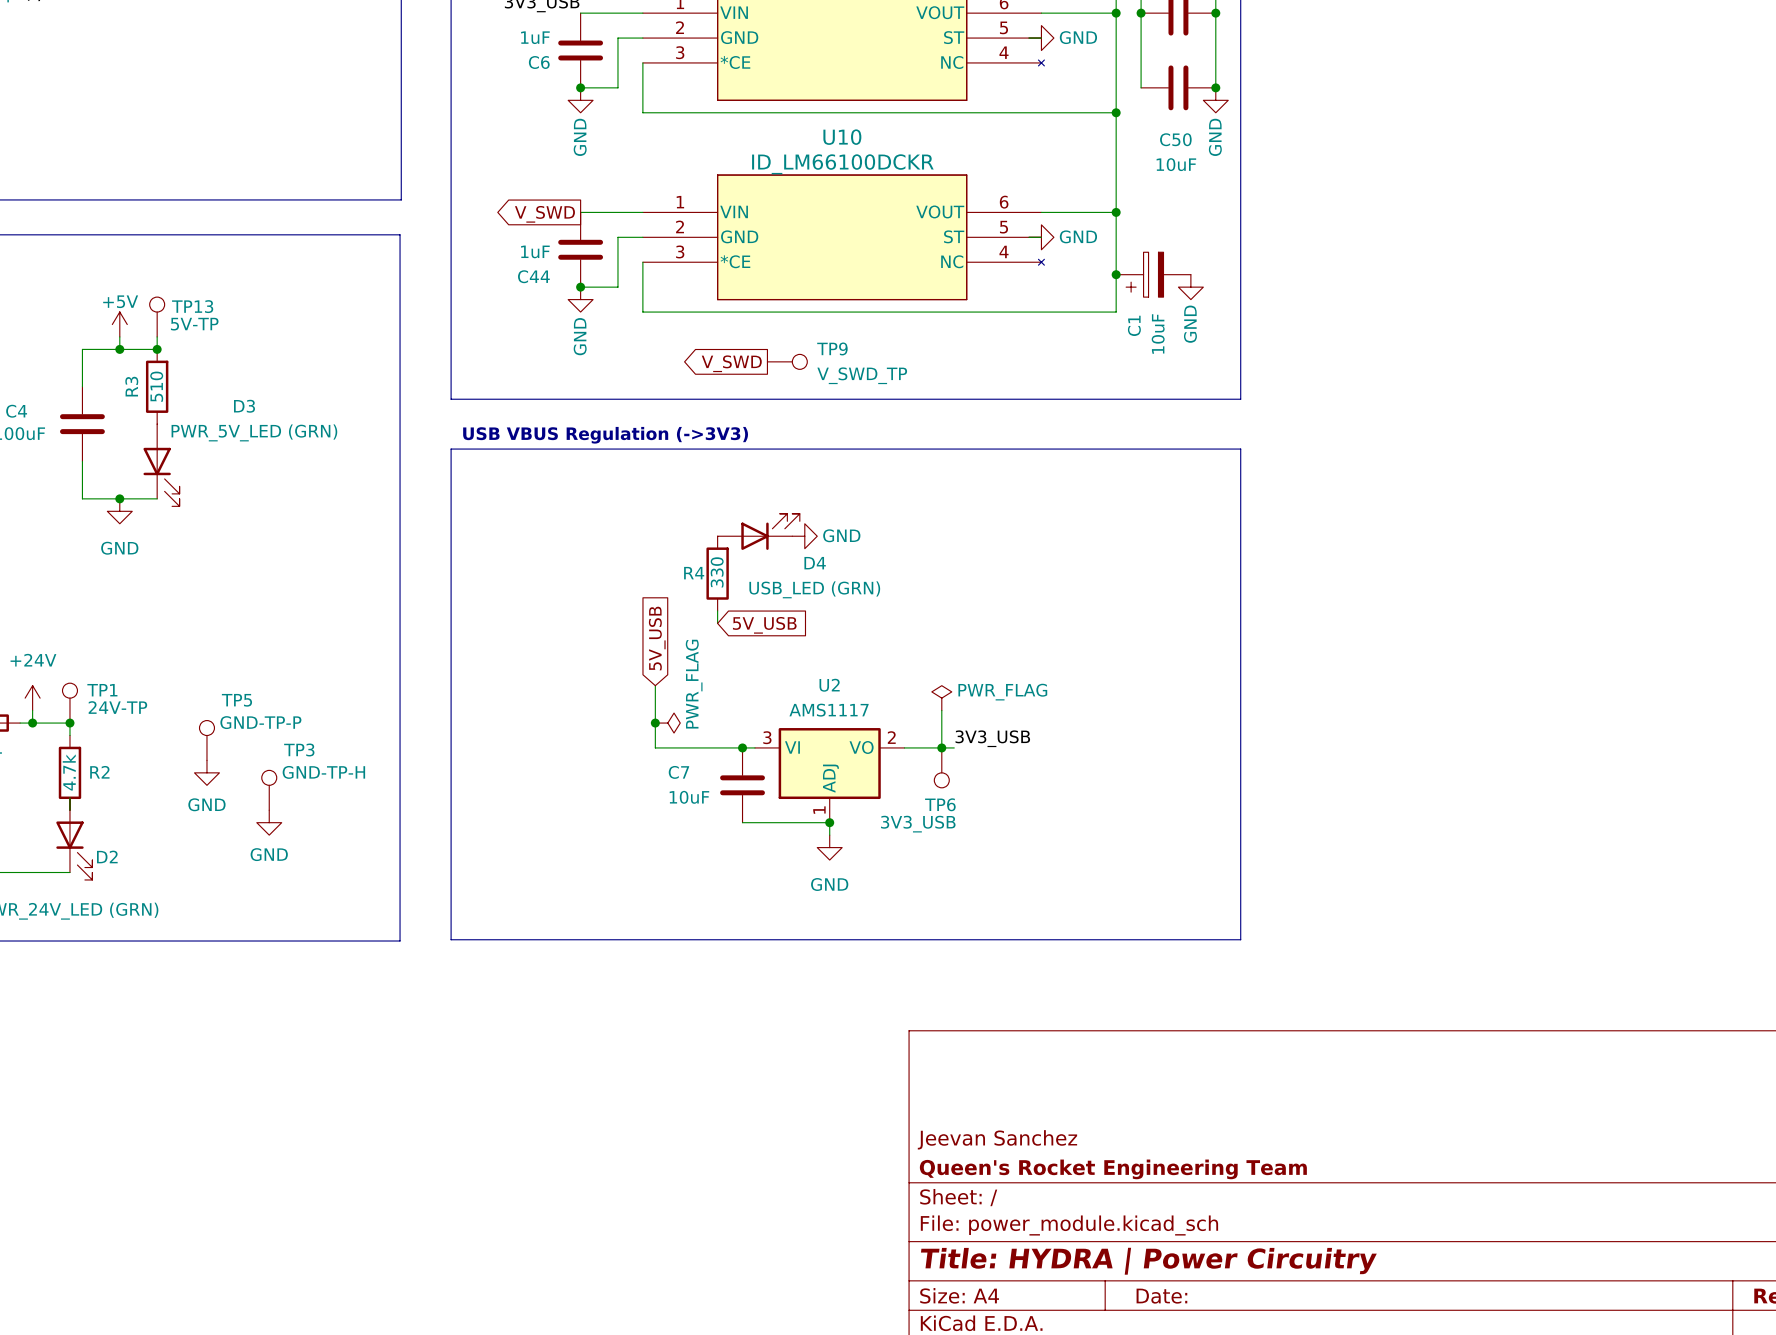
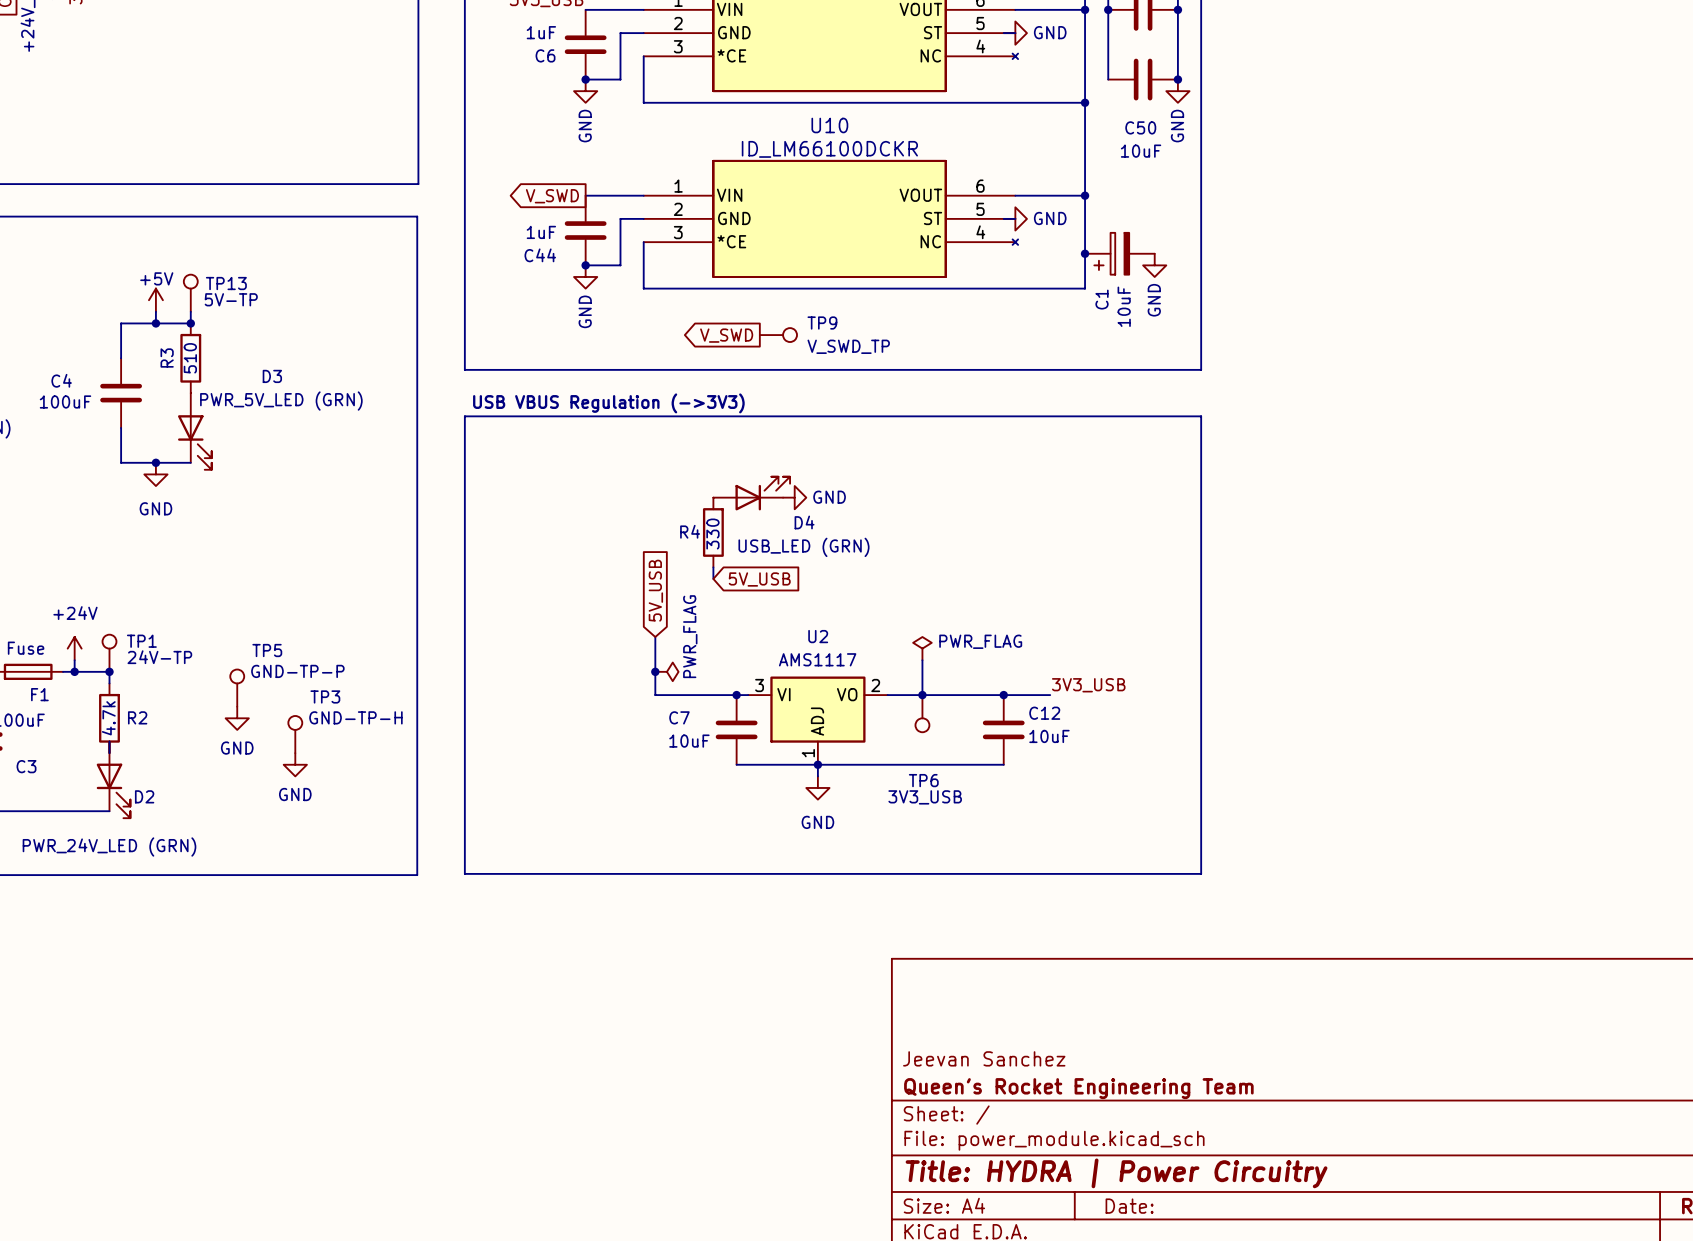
label position: 3V3_USB (992, 738) -> 3V3_USB (1088, 685)
wire: none -> (934, 695) (1050, 695)
junction: none -> (1003, 695)
C12: none -> 10uF (1003, 729)
TP6 name position: TP6 (940, 804) -> TP6 (923, 780)
wire: none -> (817, 764) (1003, 764)
TP6 value position: 3V3_USB (918, 824) -> 3V3_USB (925, 797)

